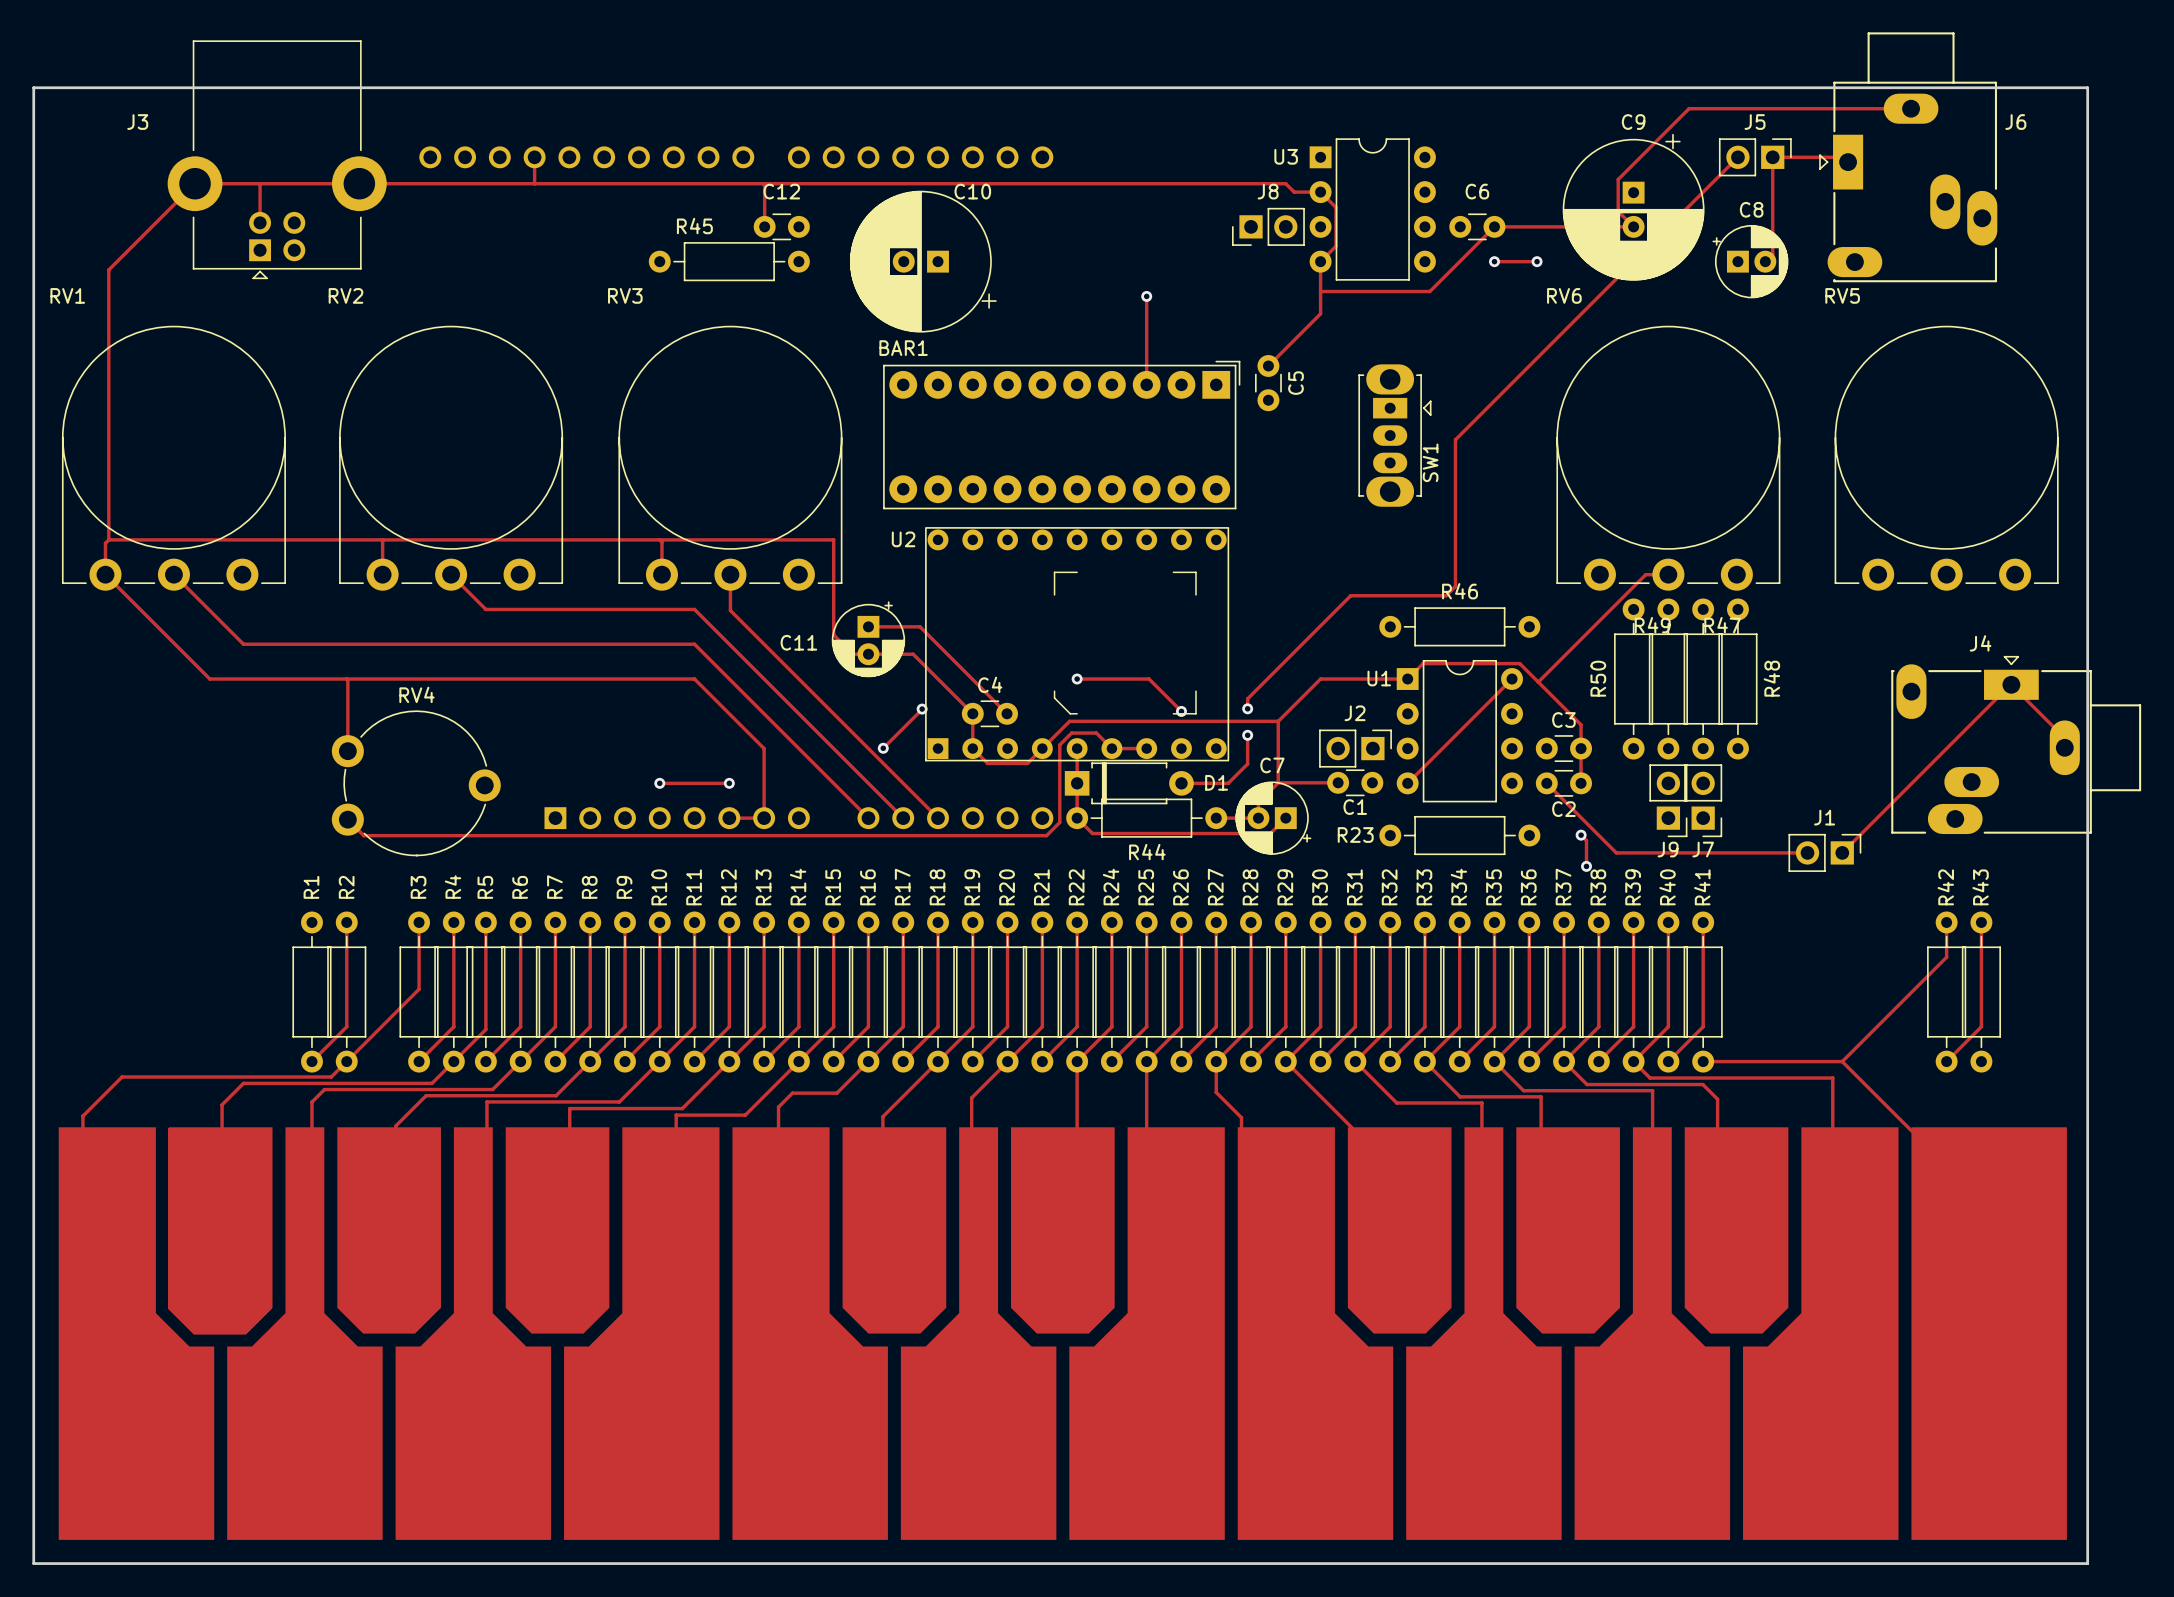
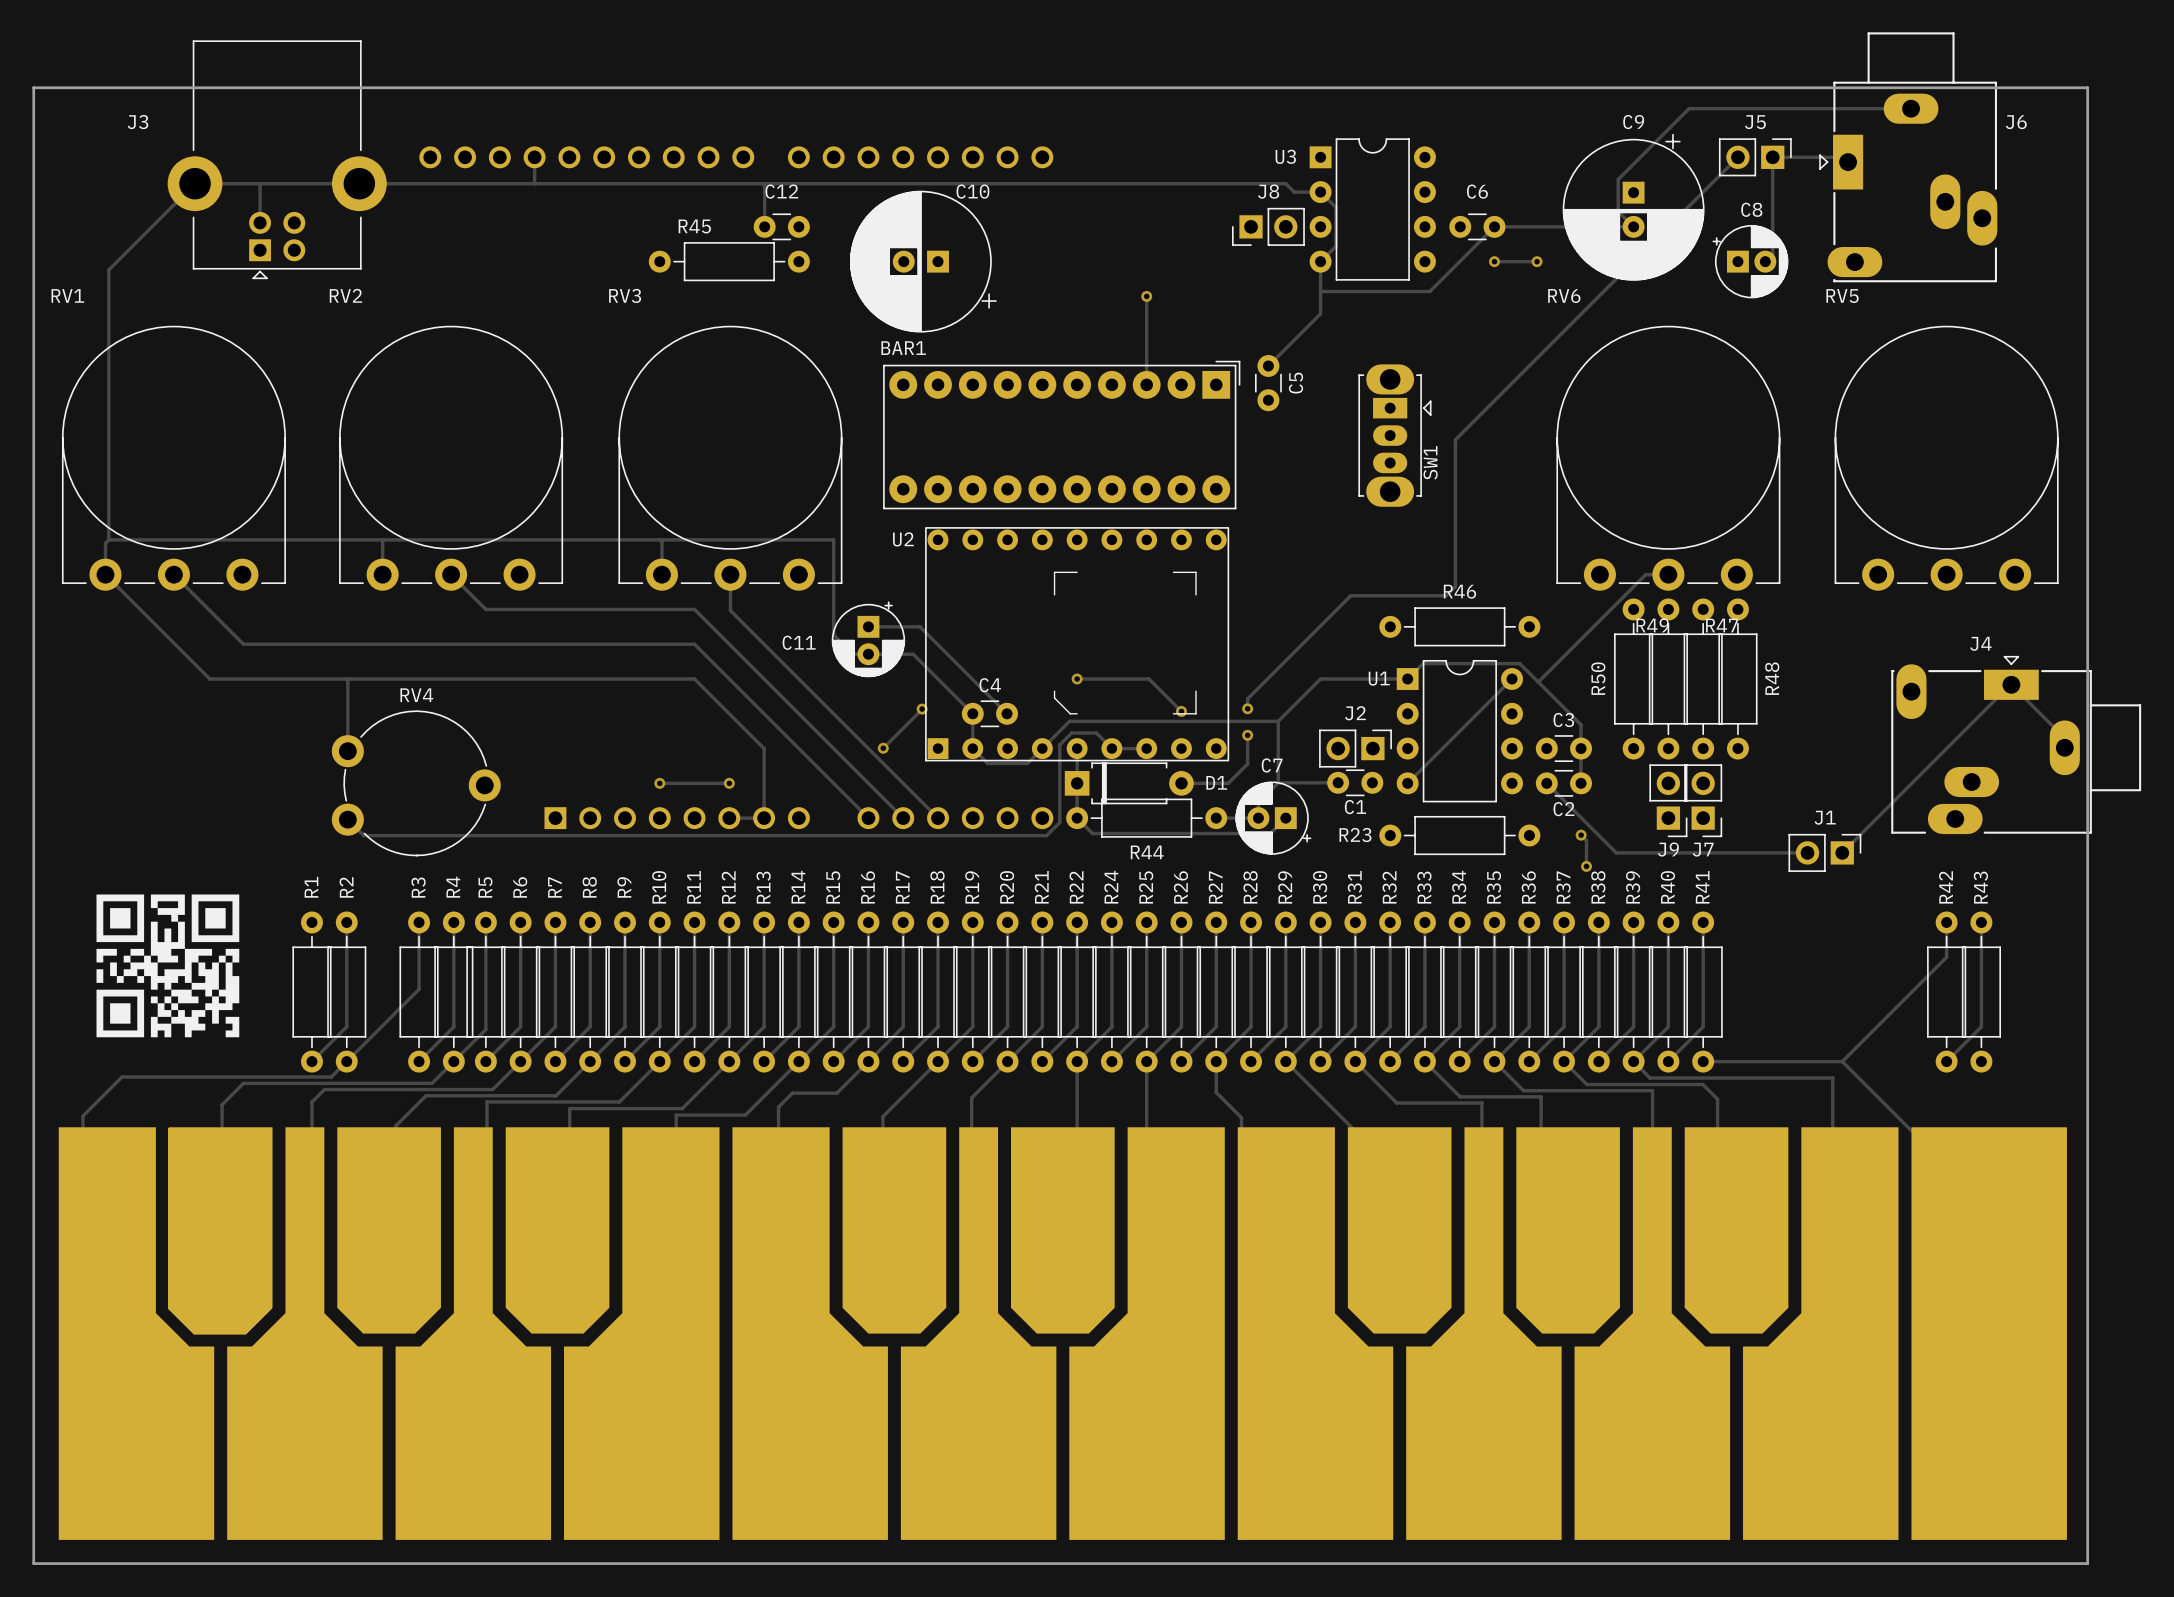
drawing: none -> [96, 894, 240, 1038]

